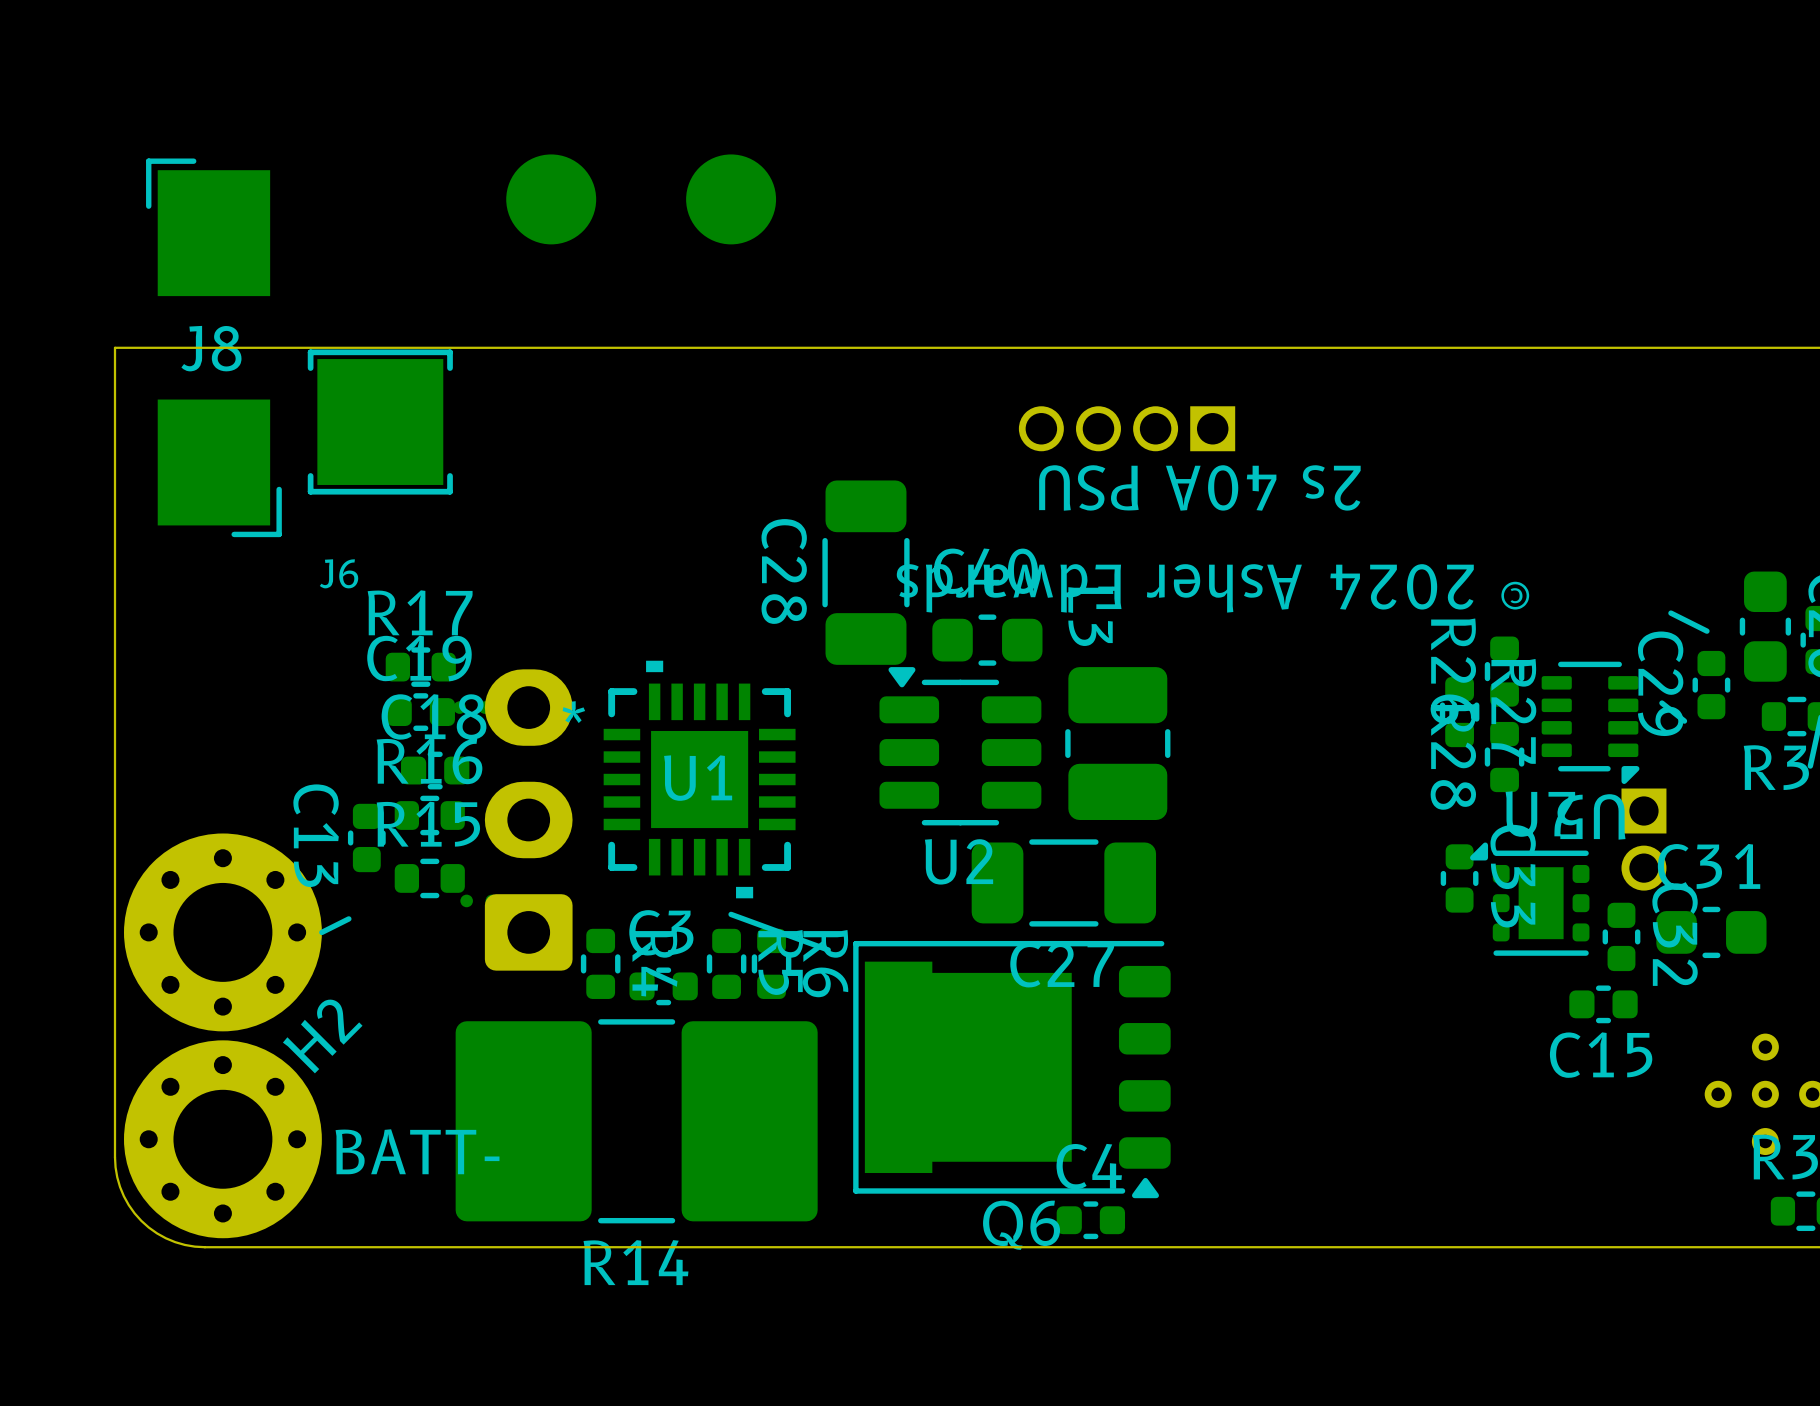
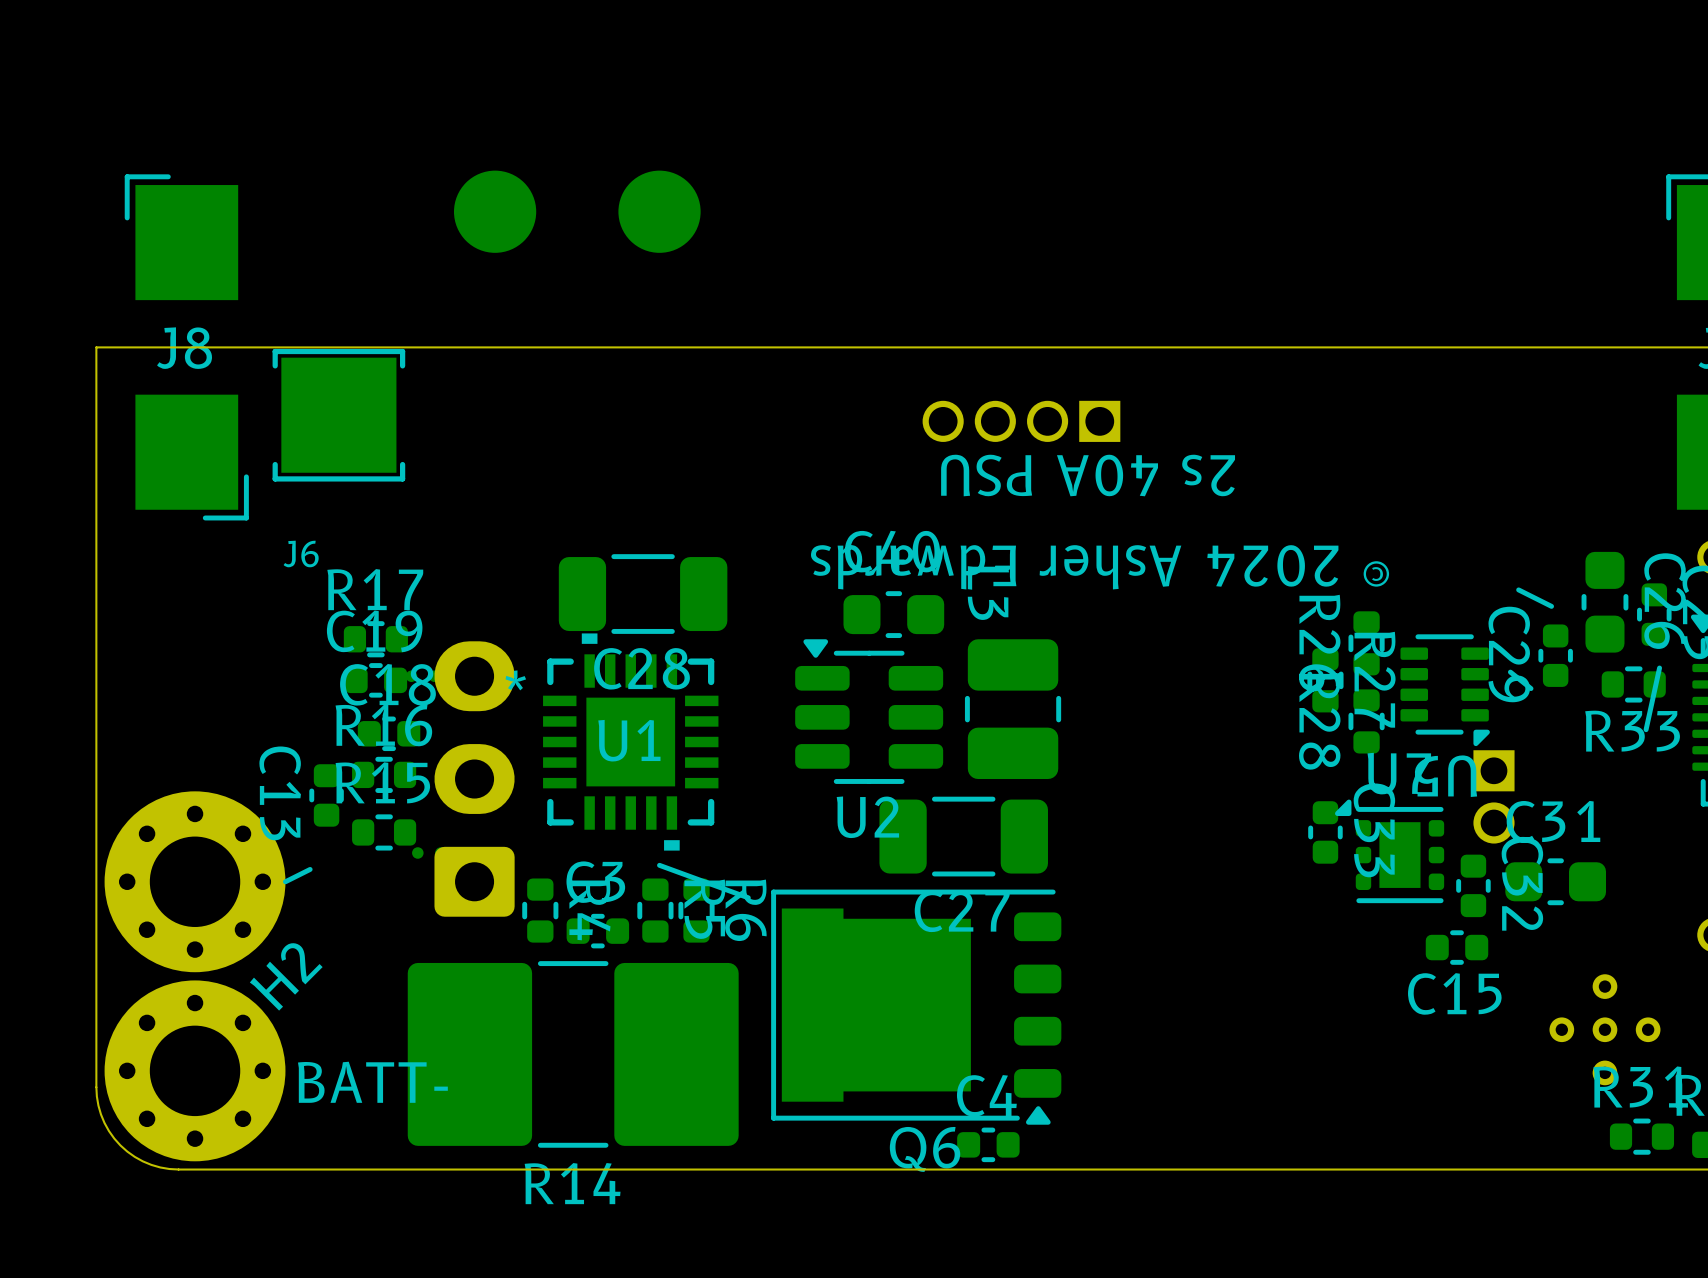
C28 name position: C28 (784, 571) -> C28 (642, 668)
C28 rotation: 0° (865, 572) -> 90° clockwise (643, 594)
C28 position: (865, 572) -> (643, 594)

